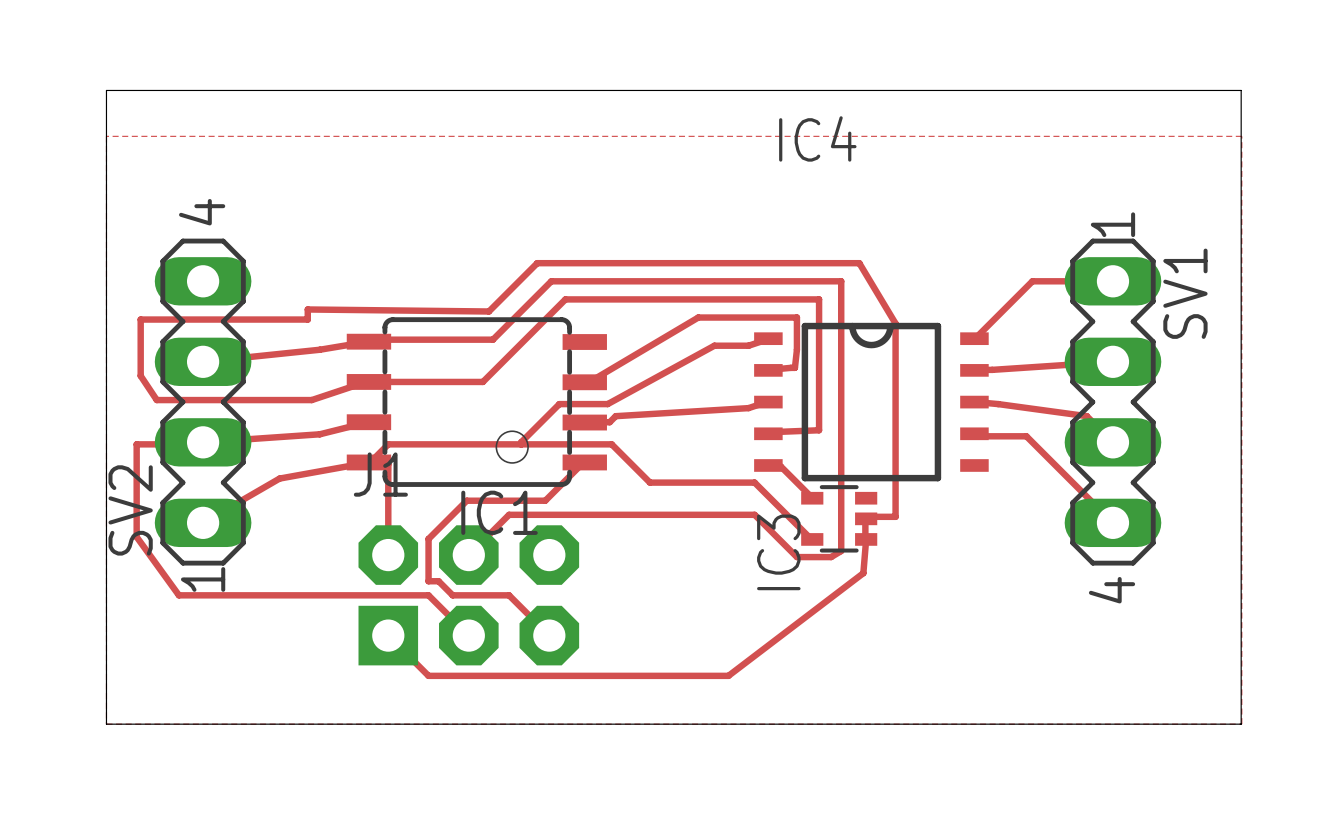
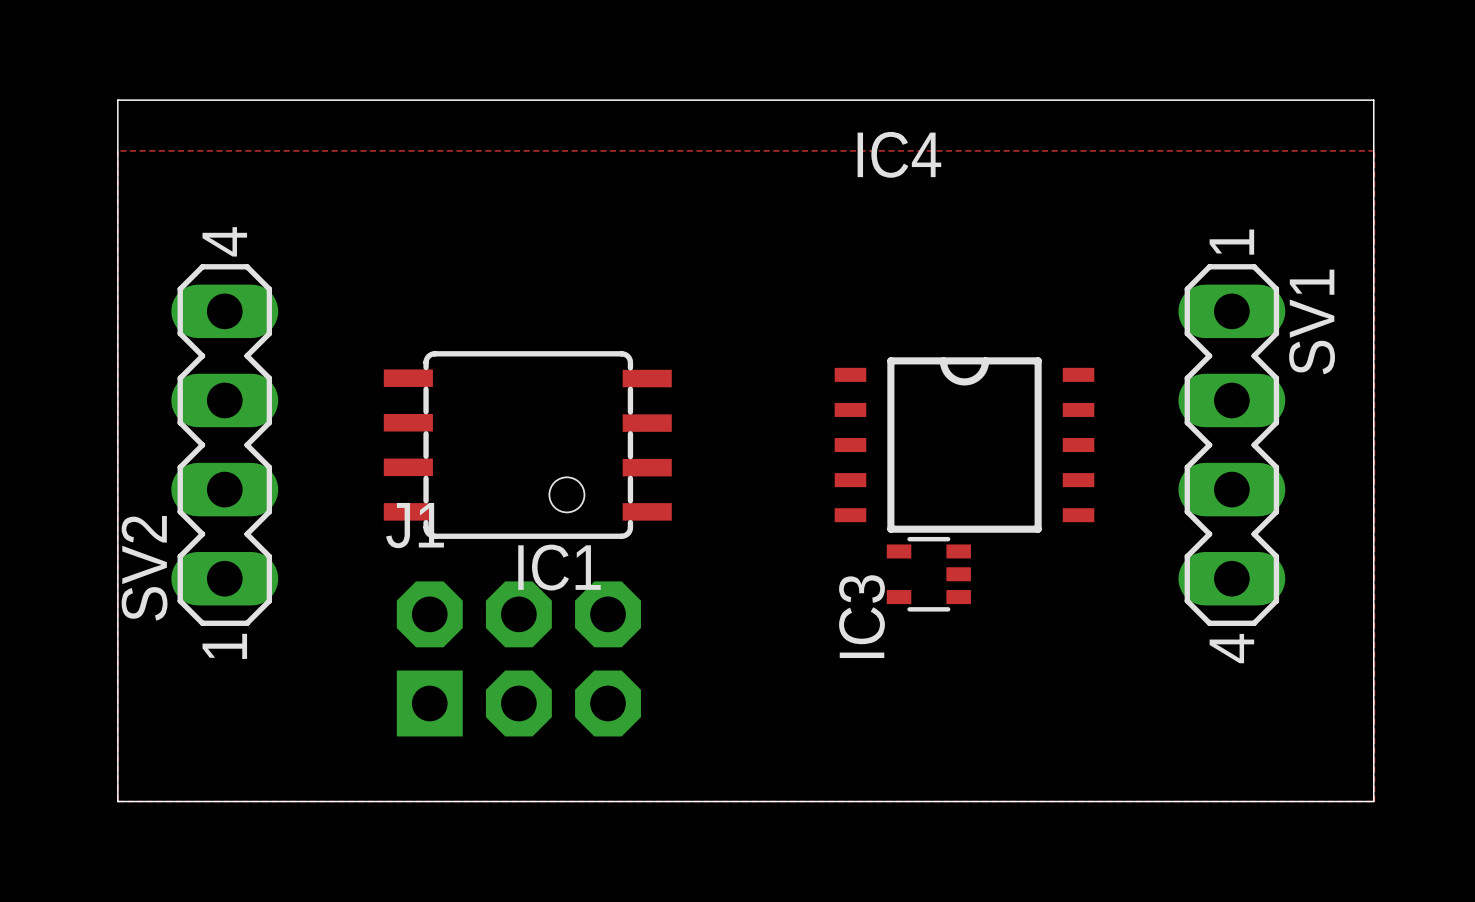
track: (1112, 281) (1032, 281) (974, 338) -> none
track: (768, 338) (748, 345) (714, 345) (607, 404) (559, 404) (521, 444) -> none
track: (203, 361) (319, 349) (368, 341) (370, 339) (492, 339) (551, 281) (841, 281) (841, 551) (831, 557) (796, 557) (754, 514) (509, 514) (468, 555) -> none
track: (1112, 361) (974, 370) -> none
track: (768, 369) (794, 367) (796, 317) (698, 317) (589, 381) (584, 382) -> none
track: (768, 402) (748, 408) (615, 416) (609, 422) (584, 422) -> none
track: (974, 402) (1086, 416) (1112, 442) -> none
track: (368, 422) (319, 434) (203, 442) (201, 444) (136, 444) (136, 536) (178, 595) (428, 595) (468, 635) -> none
track: (768, 433) (819, 430) (819, 299) (565, 299) (482, 381) (366, 381) (311, 400) (156, 400) (140, 375) (140, 319) (307, 319) (307, 309) (488, 311) (537, 263) (859, 263) (895, 323) (895, 516) (867, 516) (865, 518) (866, 539) (863, 573) (728, 675) (428, 675) (388, 635) -> none
track: (974, 433) (978, 436) (1026, 436) (1112, 522) -> none
track: (368, 462) (388, 444) (611, 444) (649, 482) (754, 482) (812, 539) -> none
track: (368, 462) (279, 478) (203, 522) -> none
track: (368, 462) (372, 464) (388, 464) (388, 555) -> none
track: (584, 462) (545, 500) (466, 500) (428, 538) (428, 581) (438, 581) (452, 595) (509, 595) (549, 635) -> none
track: (768, 465) (780, 466) (812, 498) -> none

